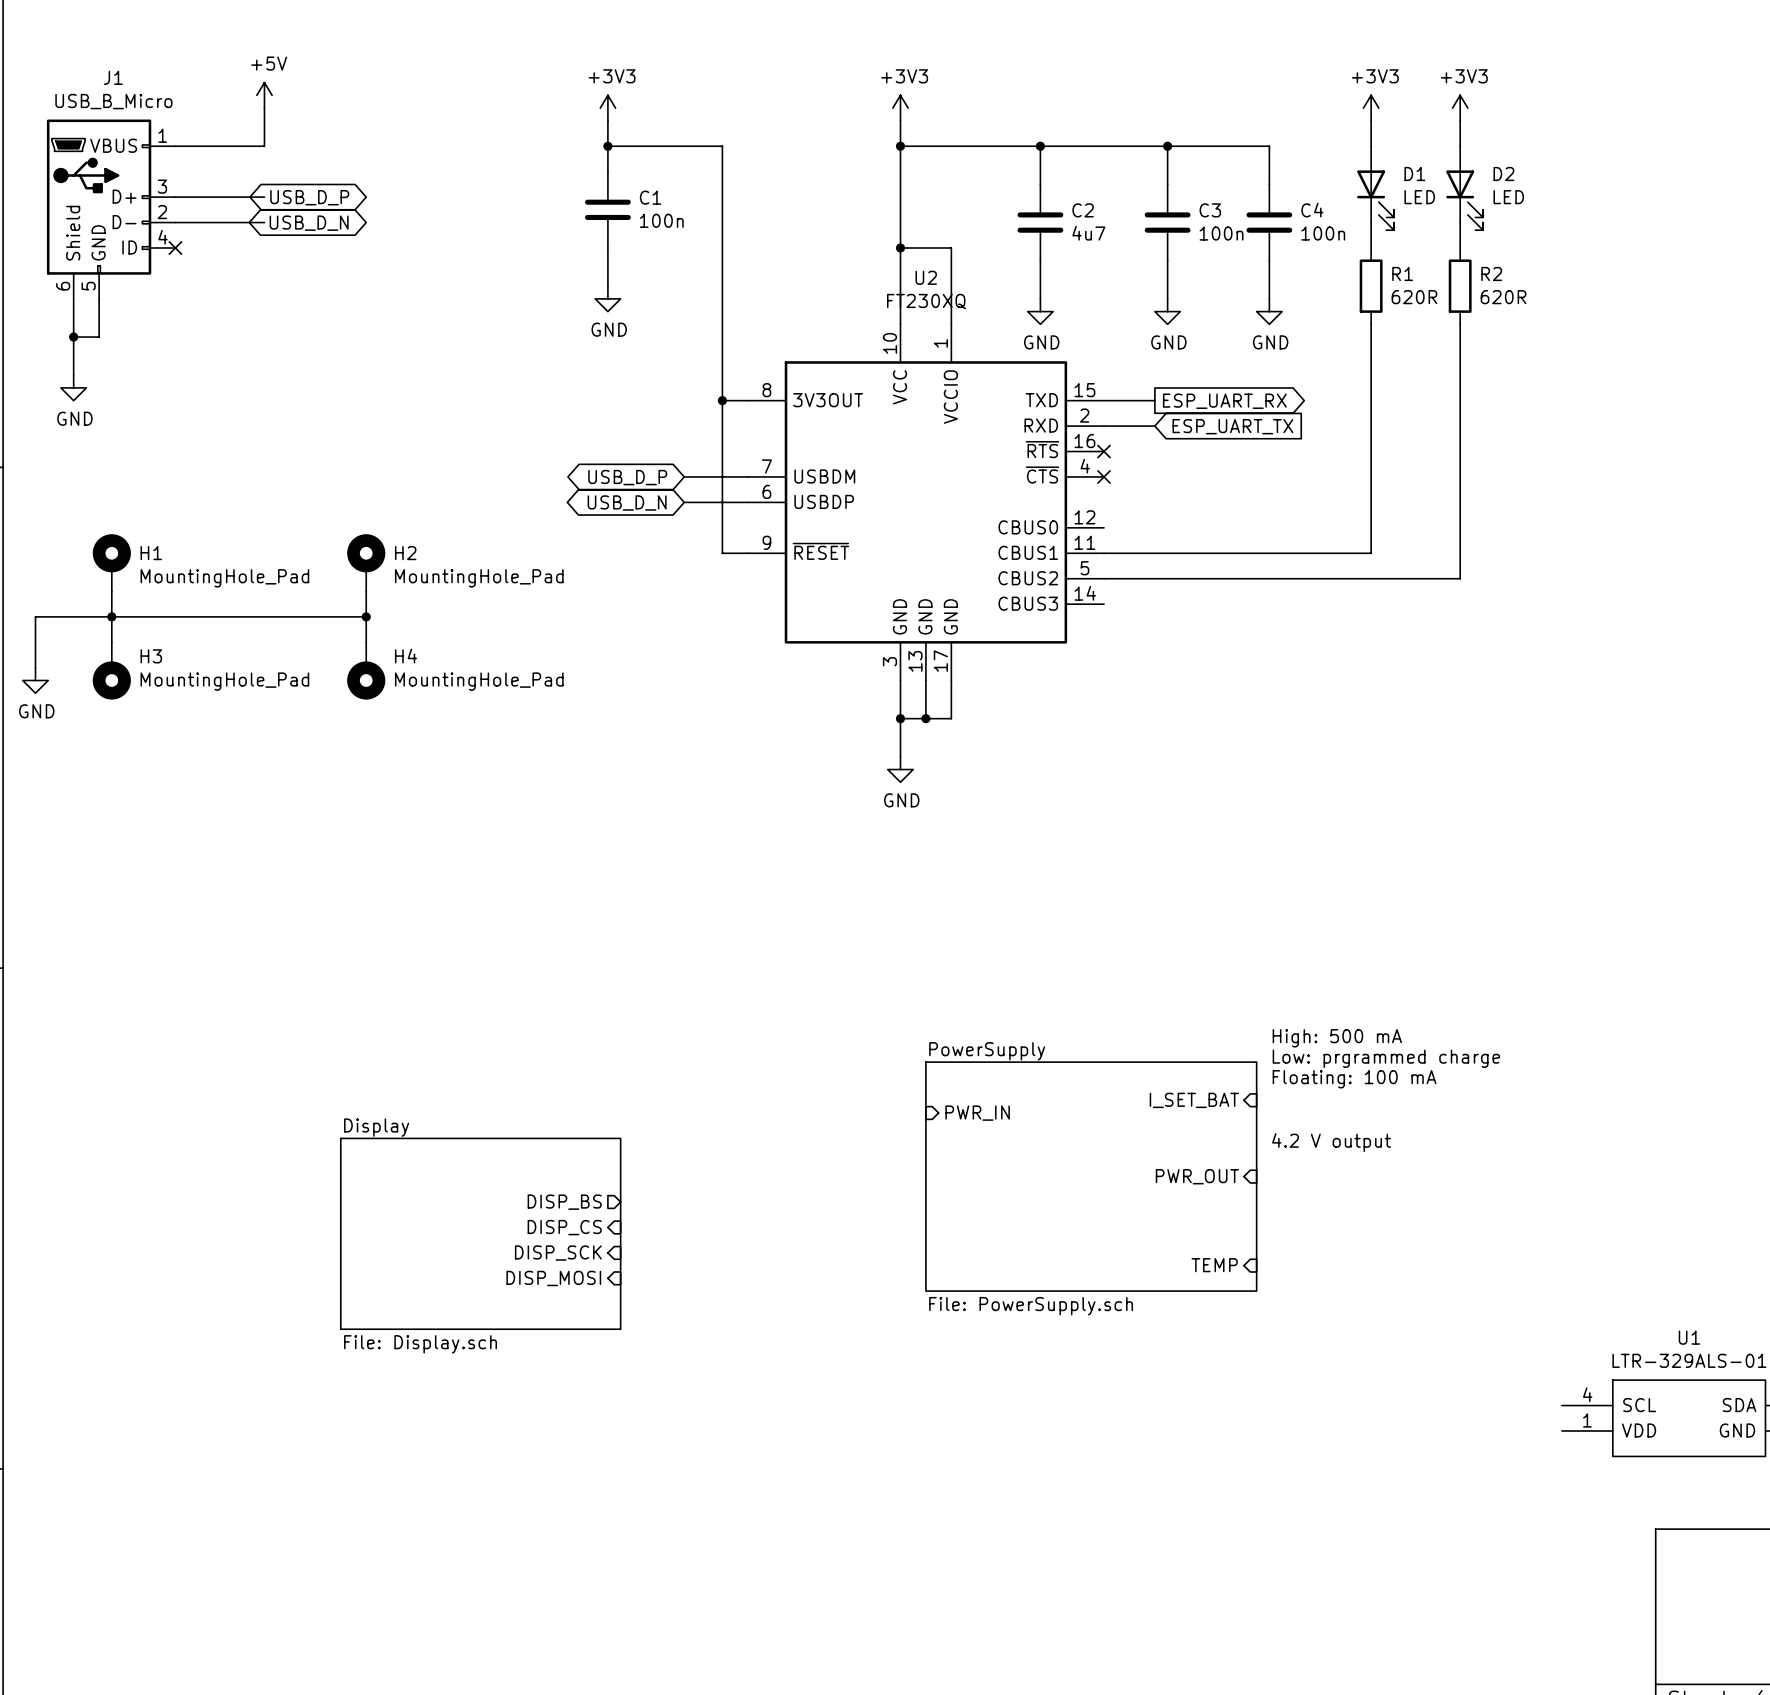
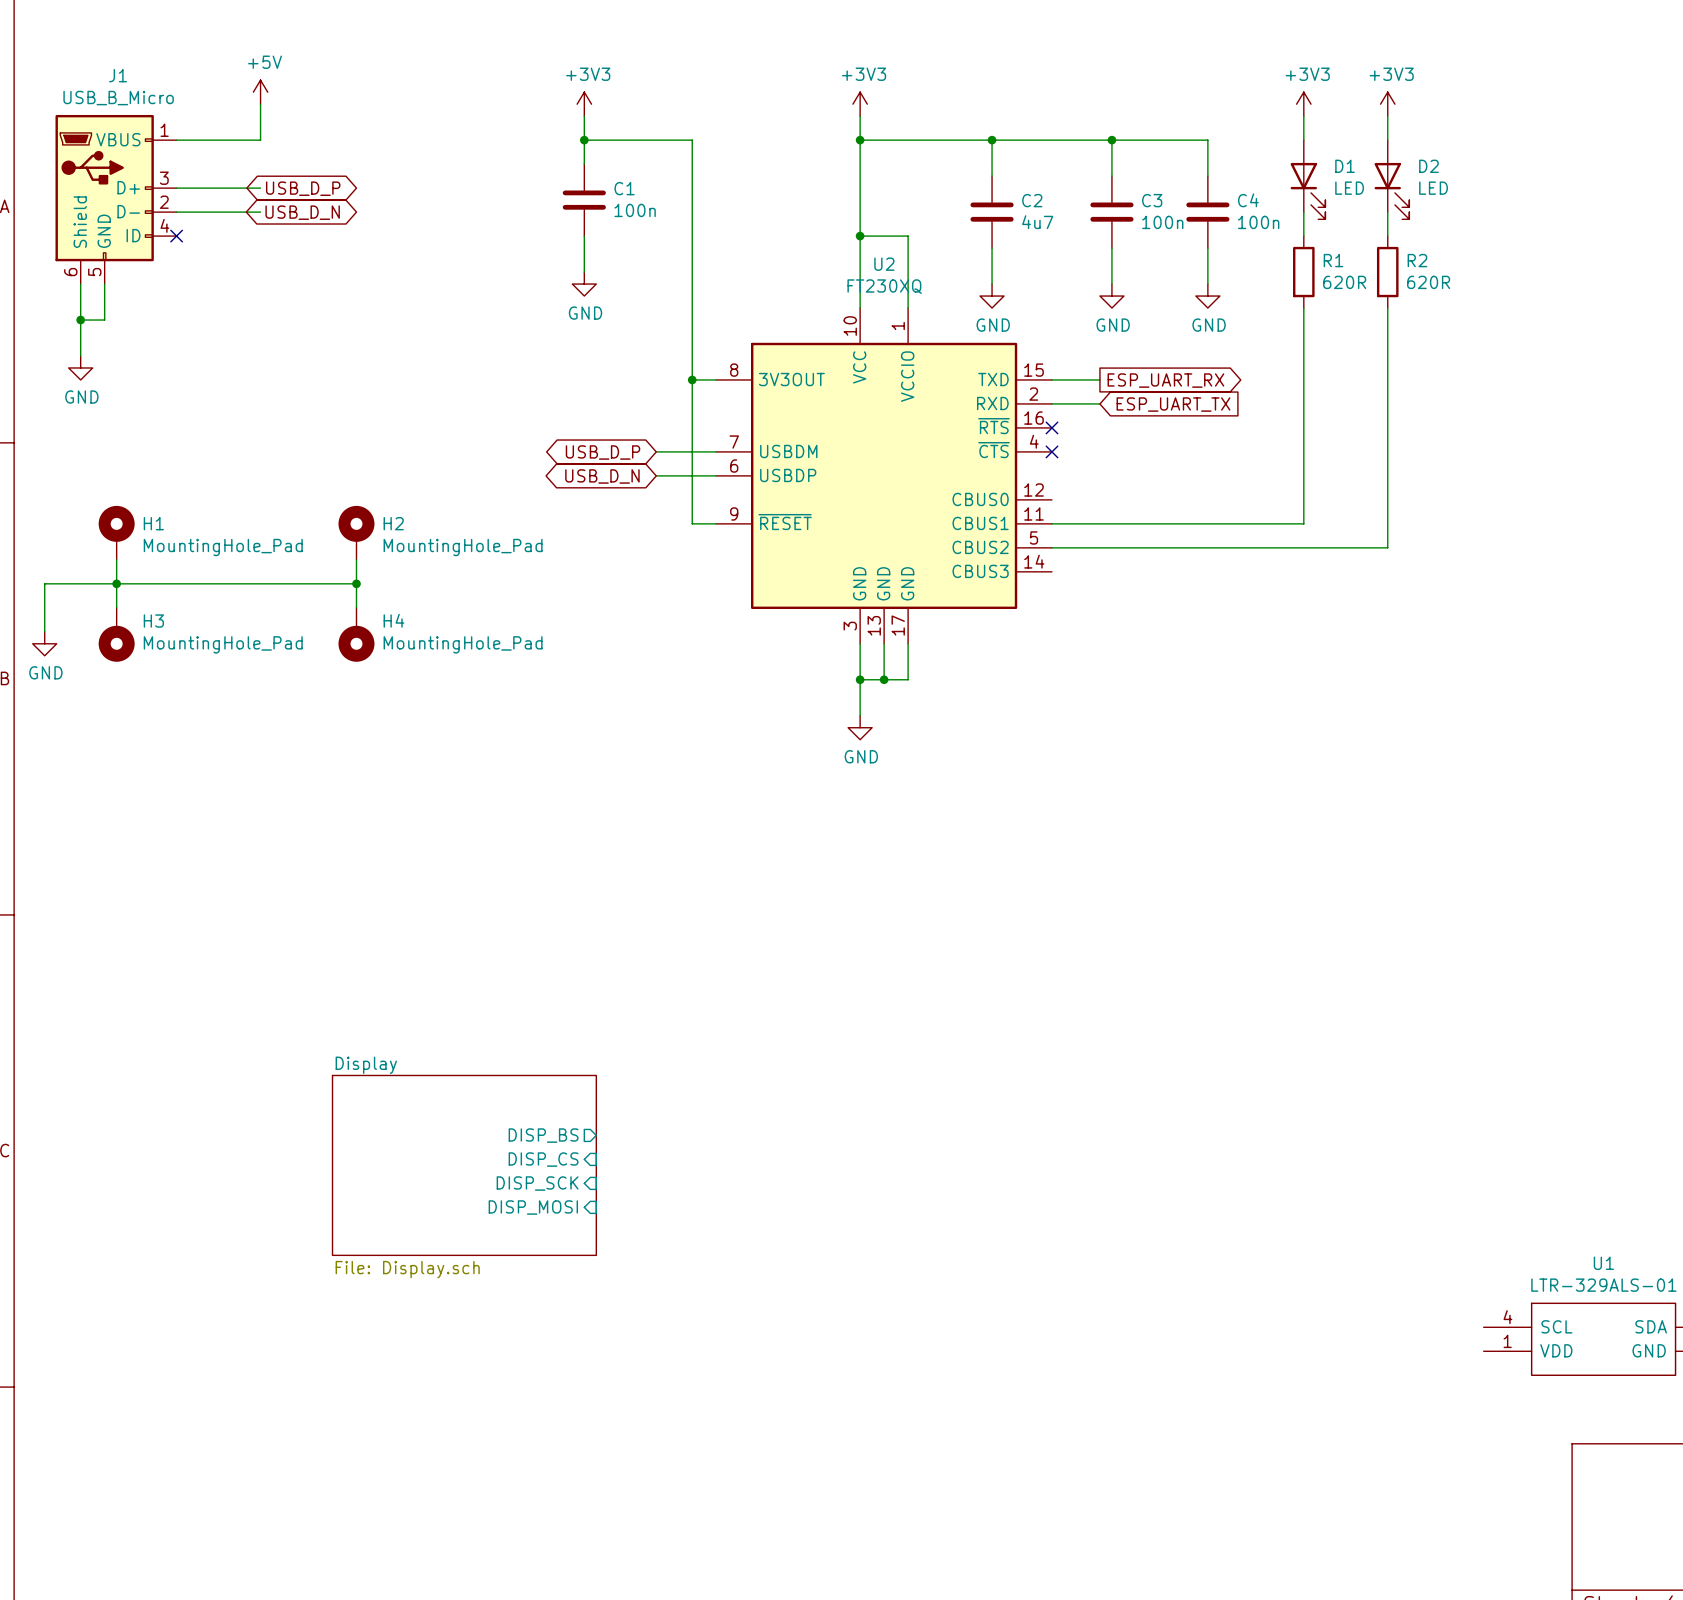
text: High: 500 mA (1337, 1038) -> none
text: Low: prgrammed charge (1386, 1058) -> none
text: Floating: 100 mA (1354, 1079) -> none
sheet pin: I_SET_BAT (1194, 1100) -> none
sheet pin: PWR_IN (977, 1113) -> none
text: 4.2 V output (1331, 1142) -> none
sheet PowerSupply: File: PowerSupply.sch (1091, 1176) -> none
sheet pin: PWR_OUT (1197, 1176) -> none
sheet pin: TEMP (1214, 1265) -> none

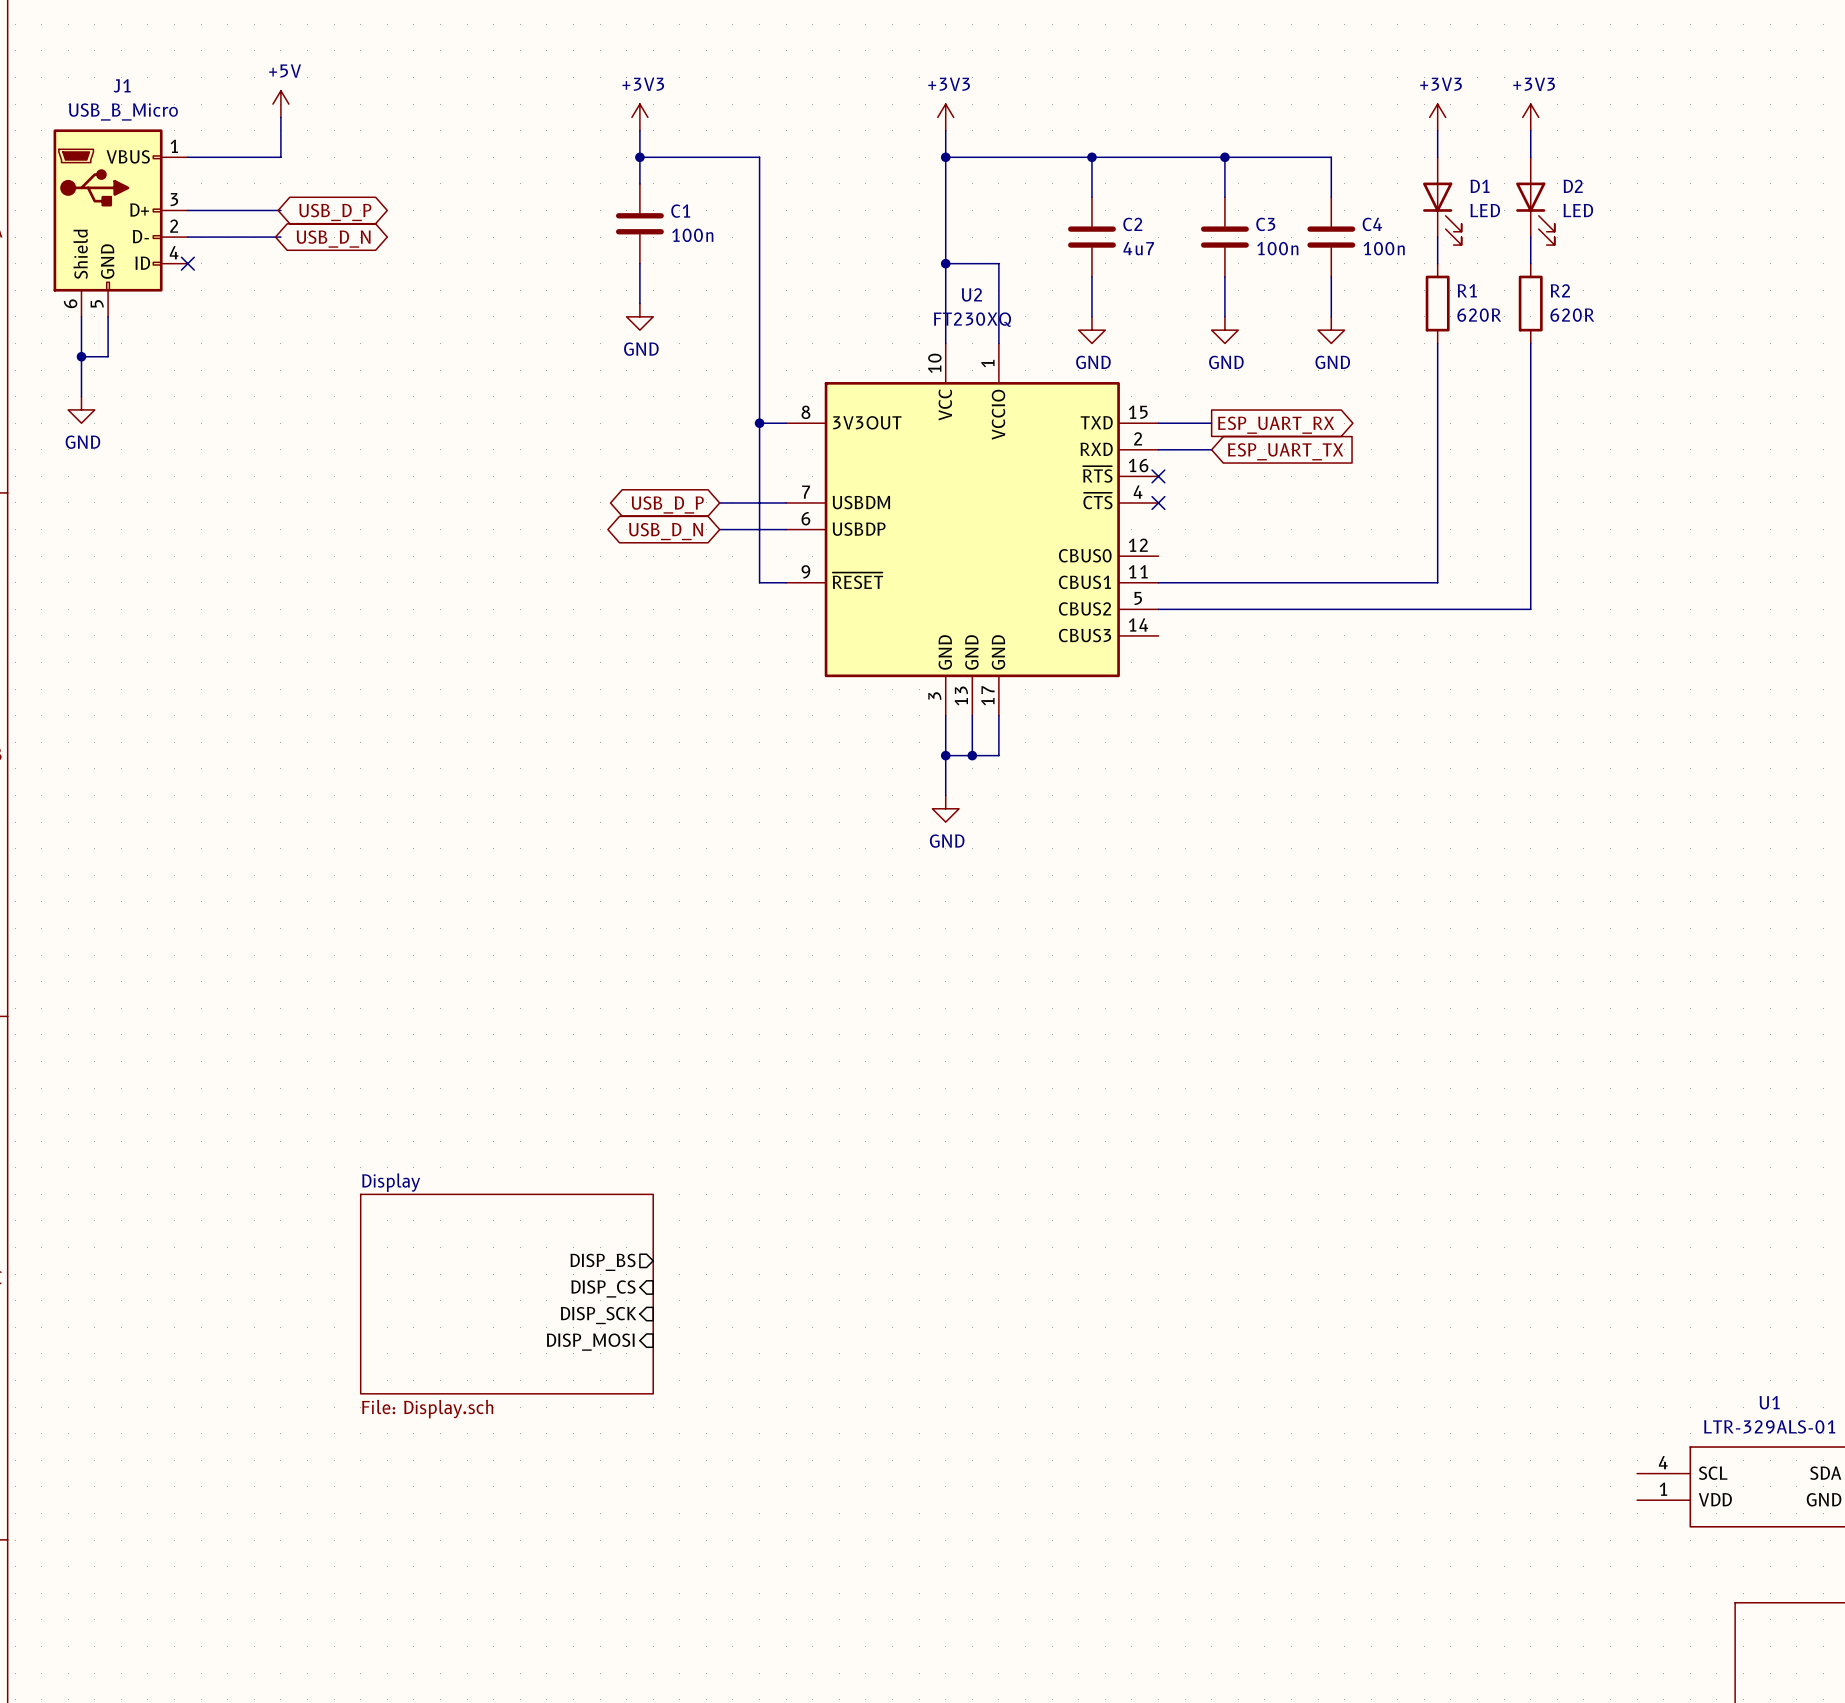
H1: MountingHole_Pad (116, 532) -> none
H2: MountingHole_Pad (356, 532) -> none
wire: (116, 559) (116, 607) -> none
wire: (356, 559) (356, 607) -> none
junction: (116, 583) -> none
wire: (356, 583) (44, 583) (44, 631) -> none
junction: (356, 583) -> none
H3: MountingHole_Pad (116, 634) -> none
H4: MountingHole_Pad (356, 634) -> none
power symbol: GND (44, 643) -> none

